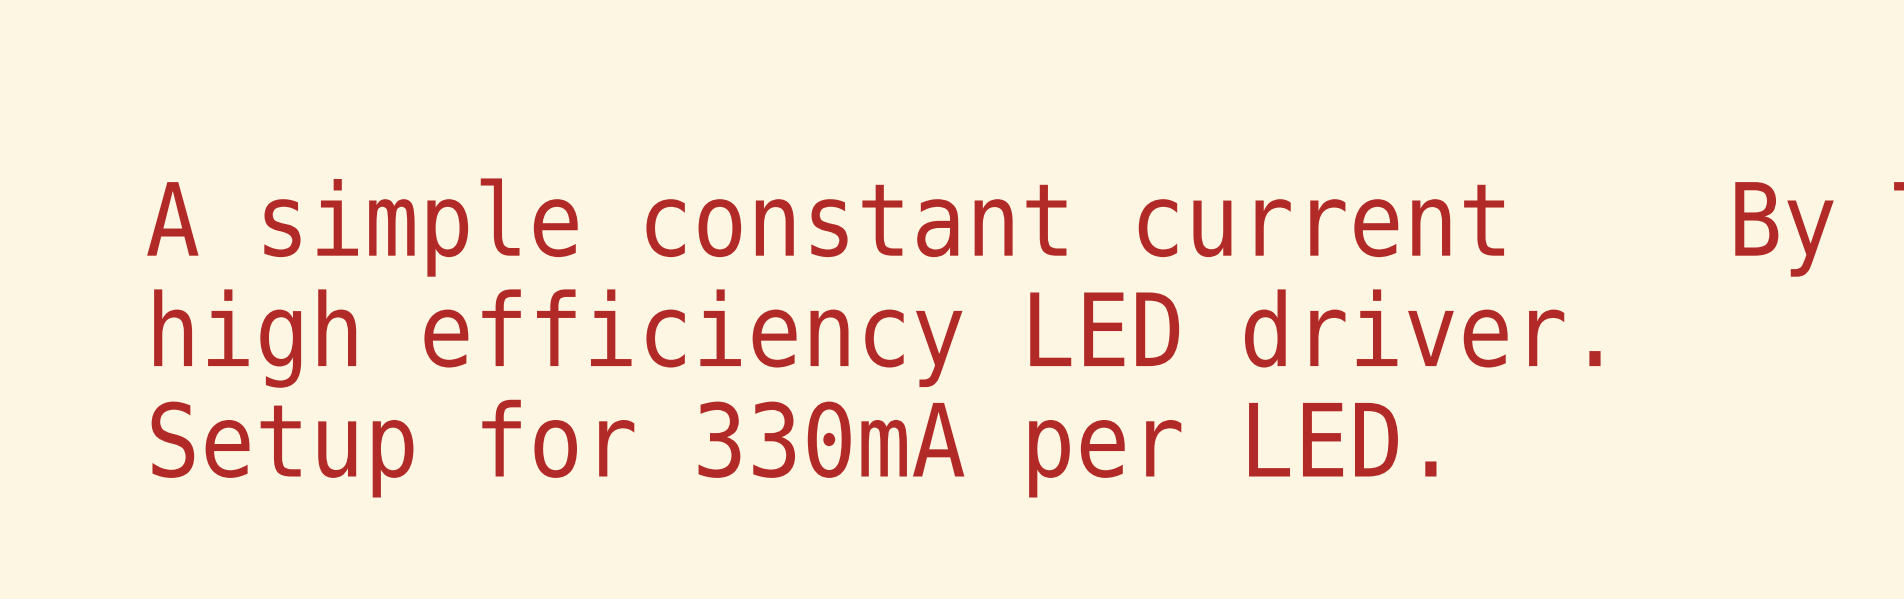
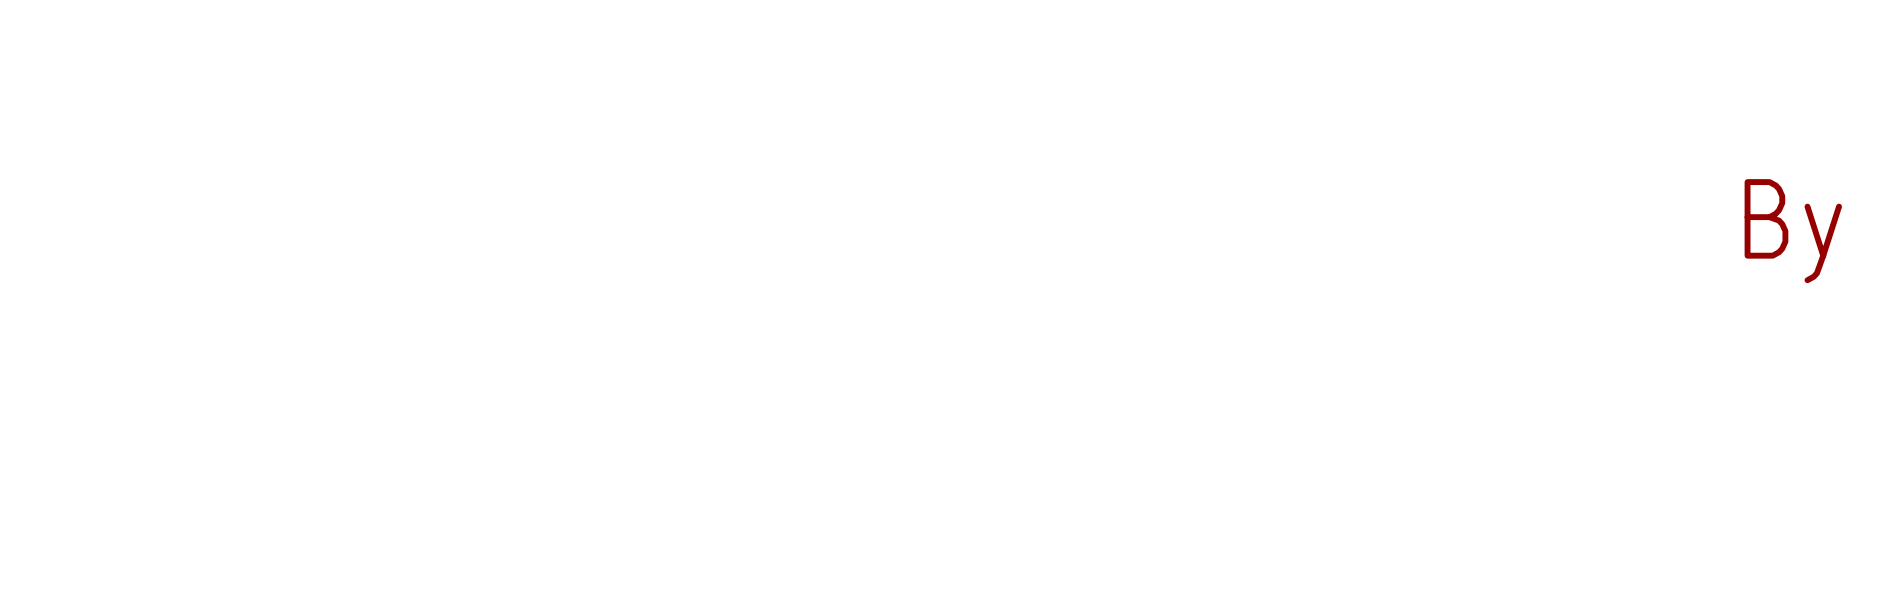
text: A simple constant current (825, 227) -> none
text: high efficiency LED driver. (877, 338) -> none
text: Setup for 330mA per LED. (794, 448) -> none

